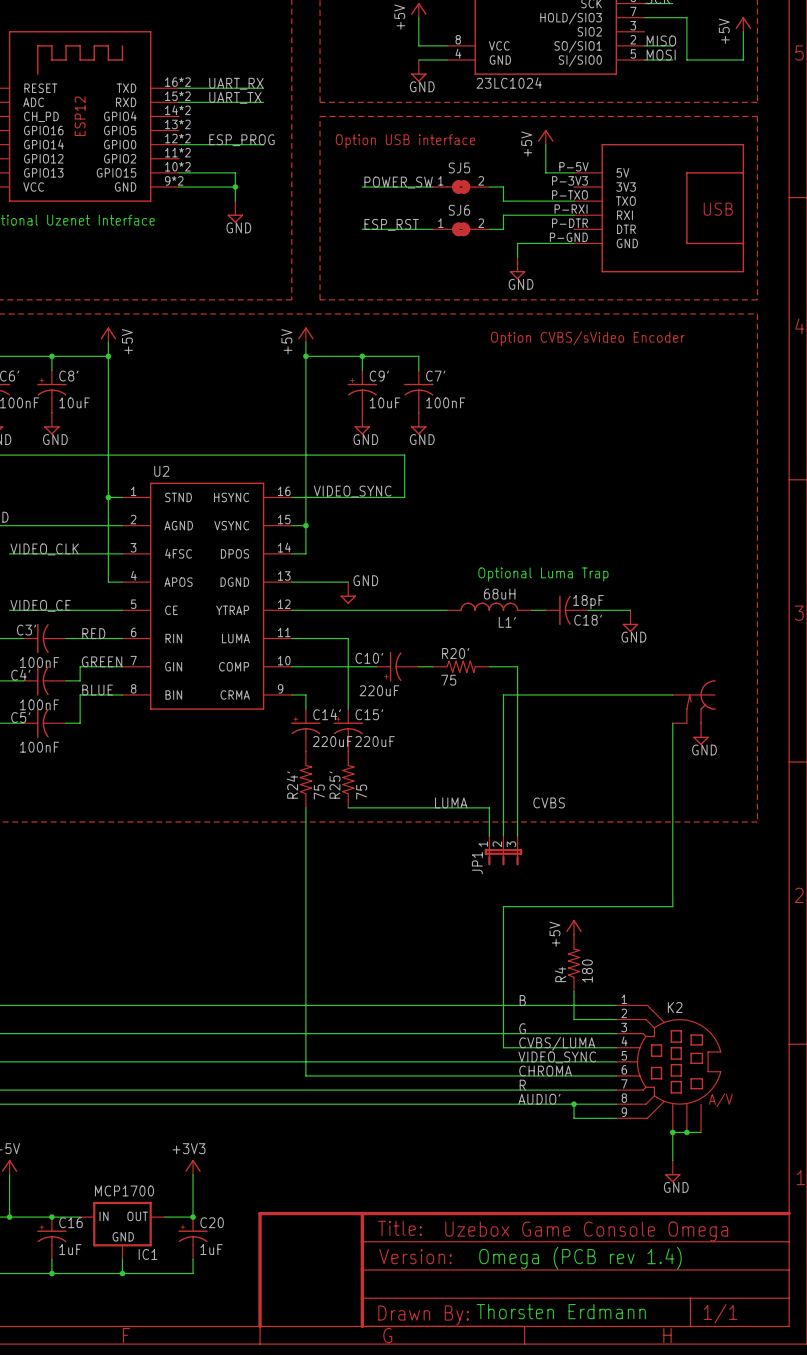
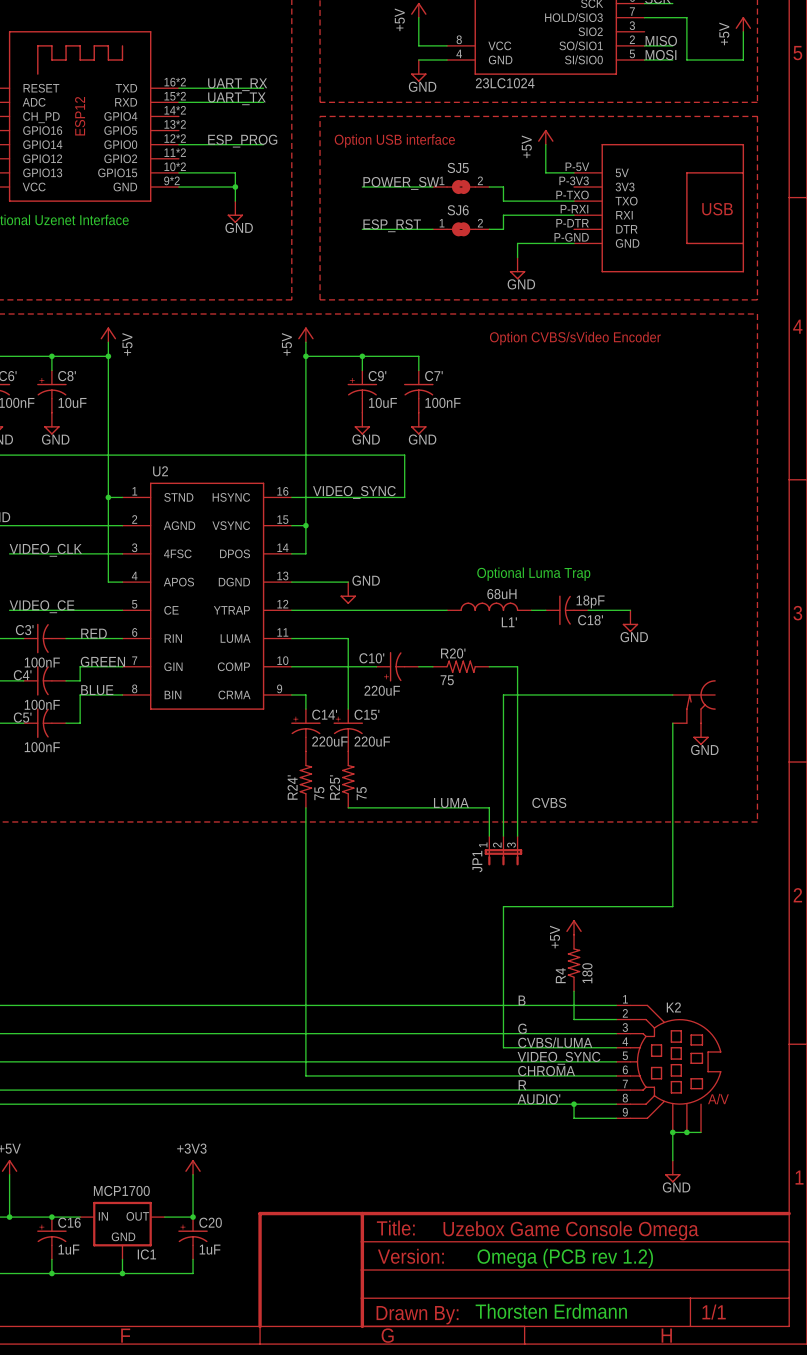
text: Omega (PCB rev 1.4) (580, 1258) -> Omega (PCB rev 1.2) (565, 1258)

